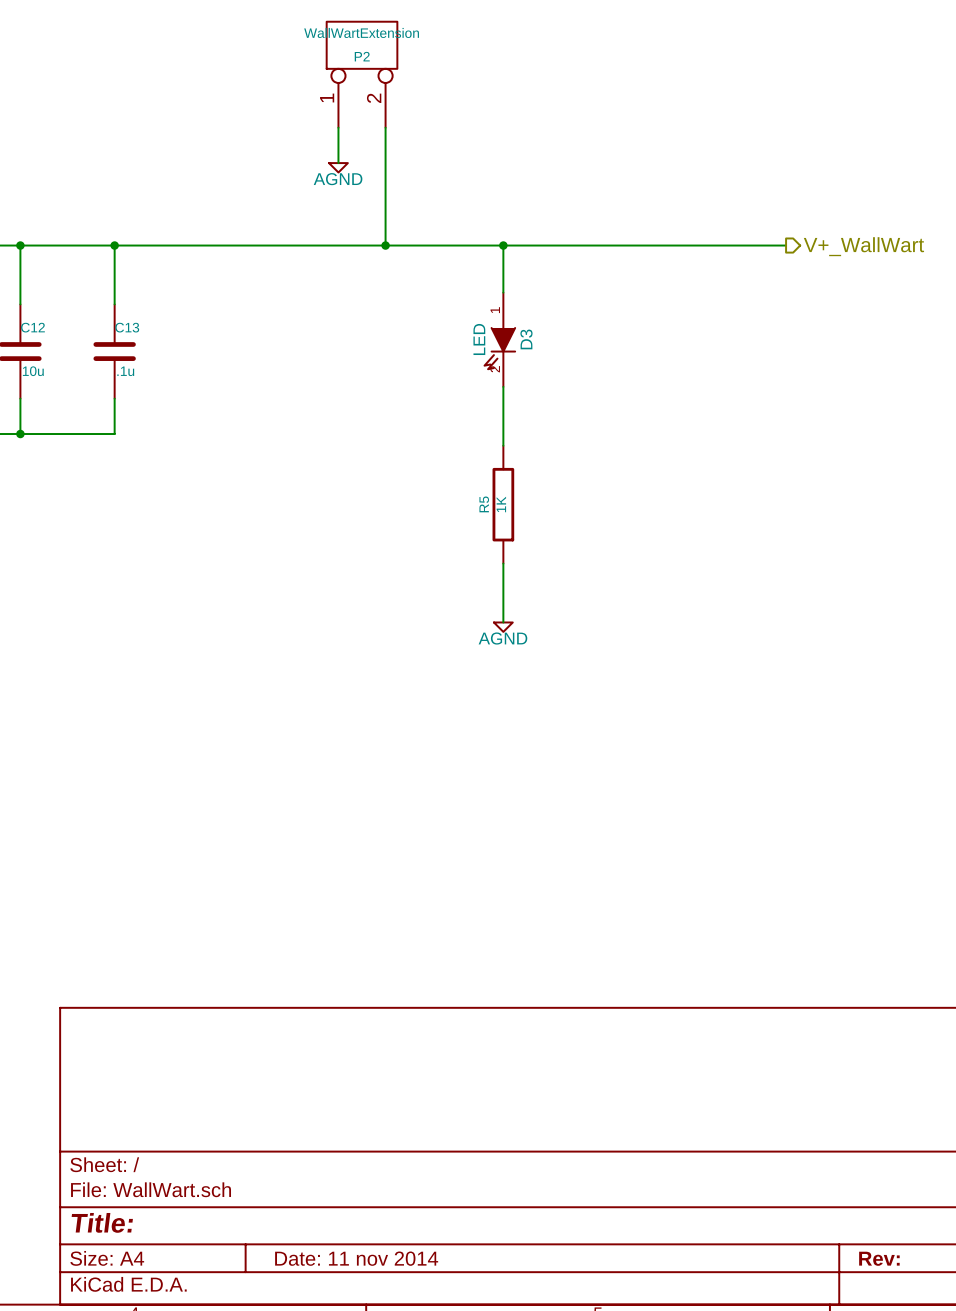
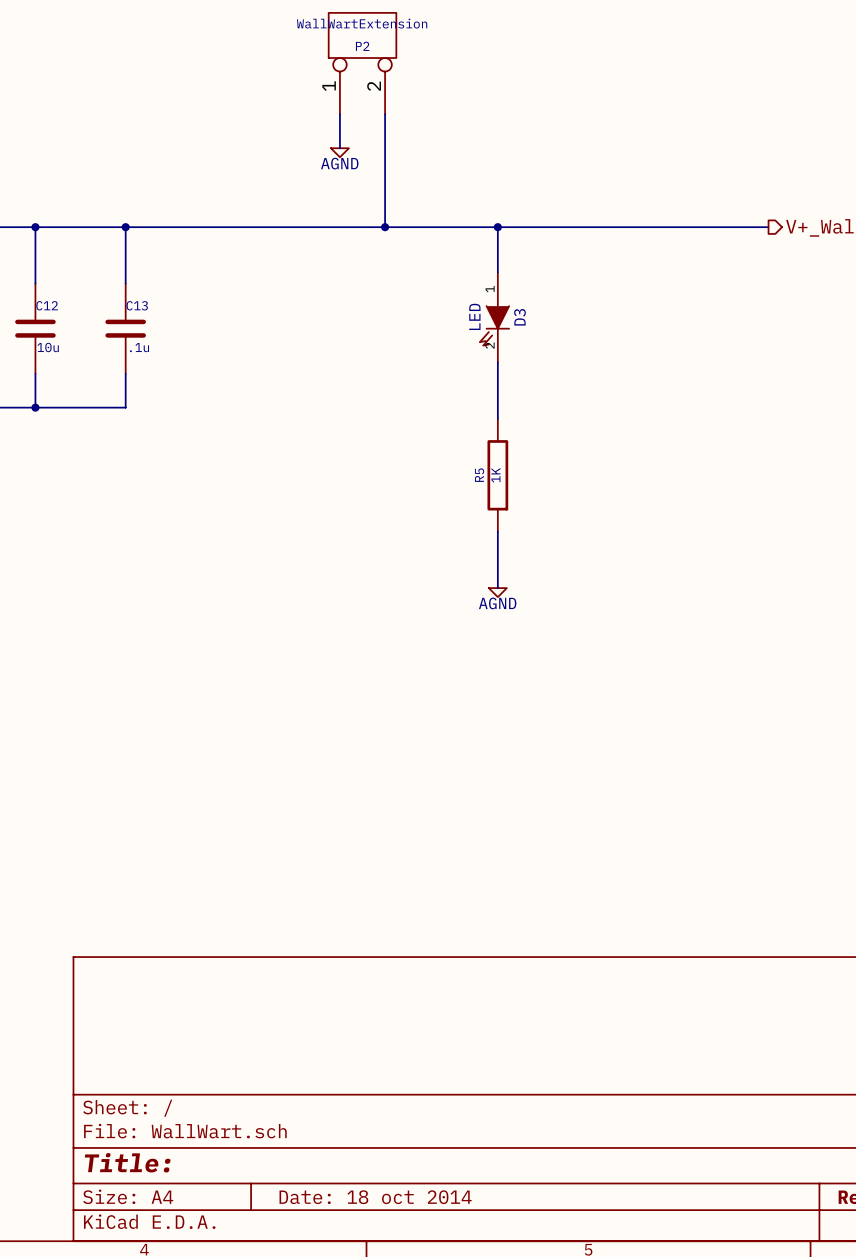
title block: Date: 11 nov 2014 (356, 1258) -> Date: 18 oct 2014 (375, 1197)

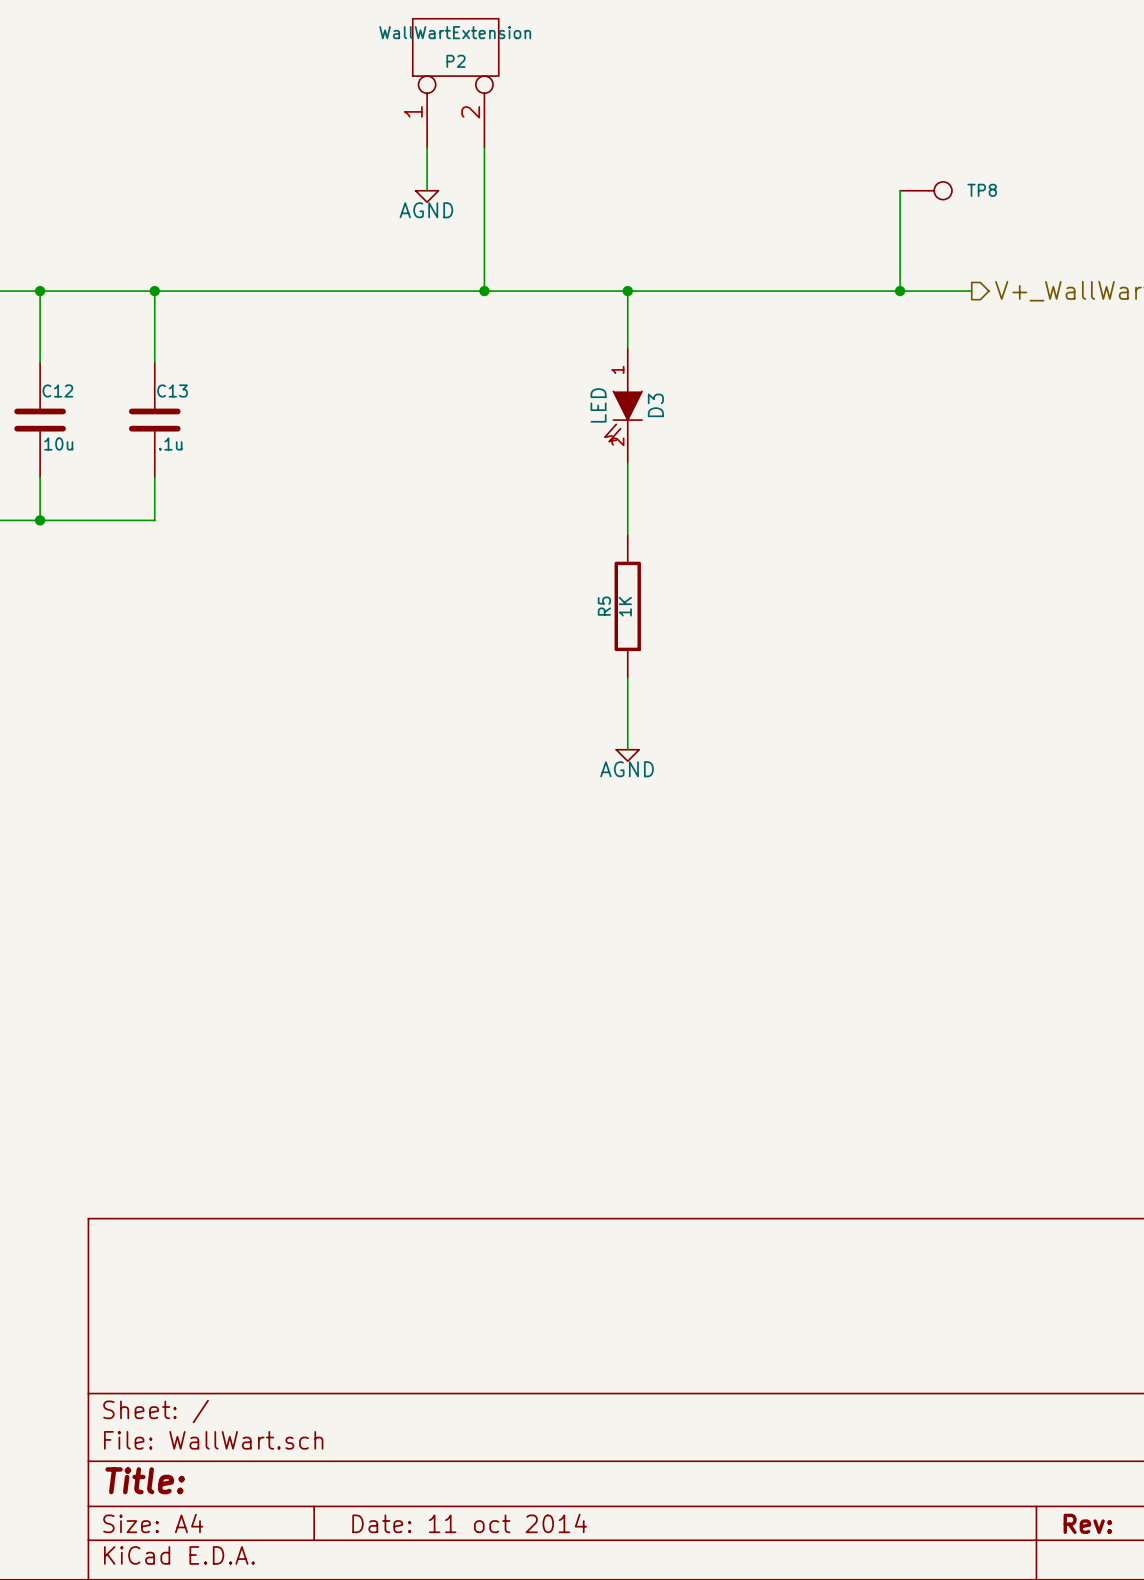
wire: none -> (900, 190) (900, 291)
TP8: none -> (926, 190)
junction: none -> (900, 291)
title block: Date: 18 oct 2014 (375, 1197) -> Date: 11 oct 2014 (469, 1523)

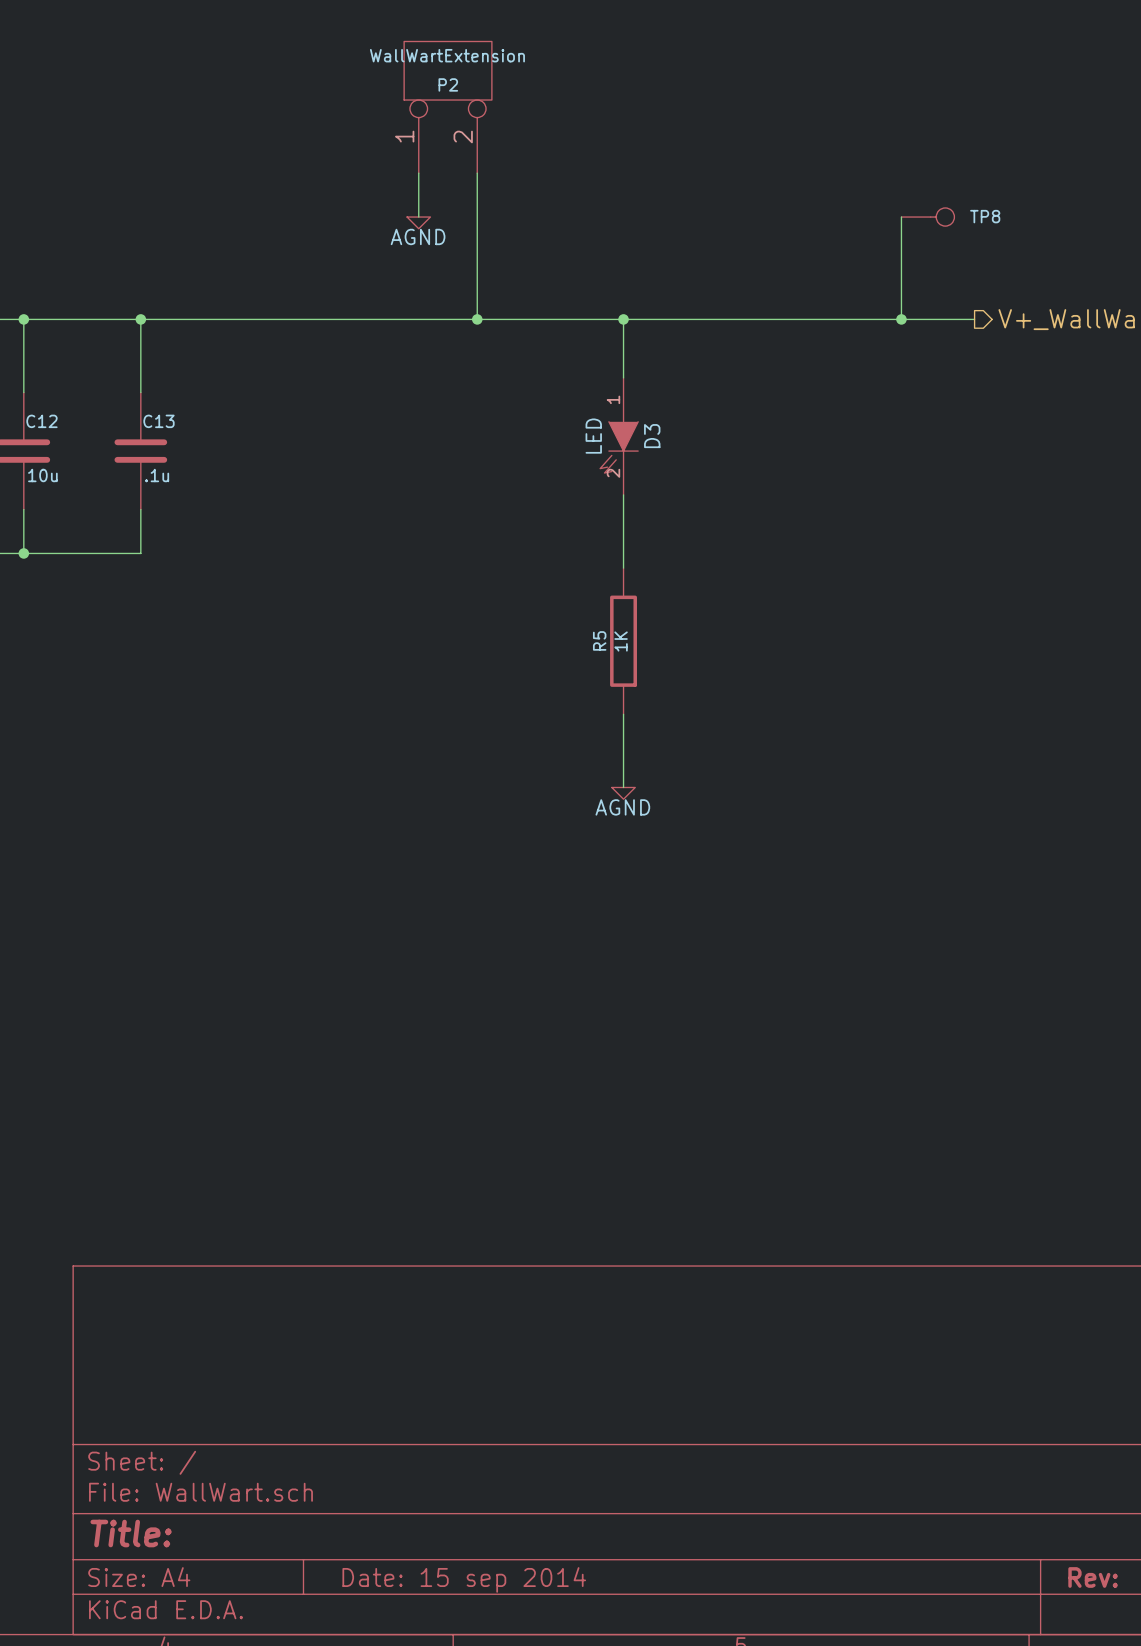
title block: Date: 11 oct 2014 (469, 1523) -> Date: 15 sep 2014 (464, 1579)

